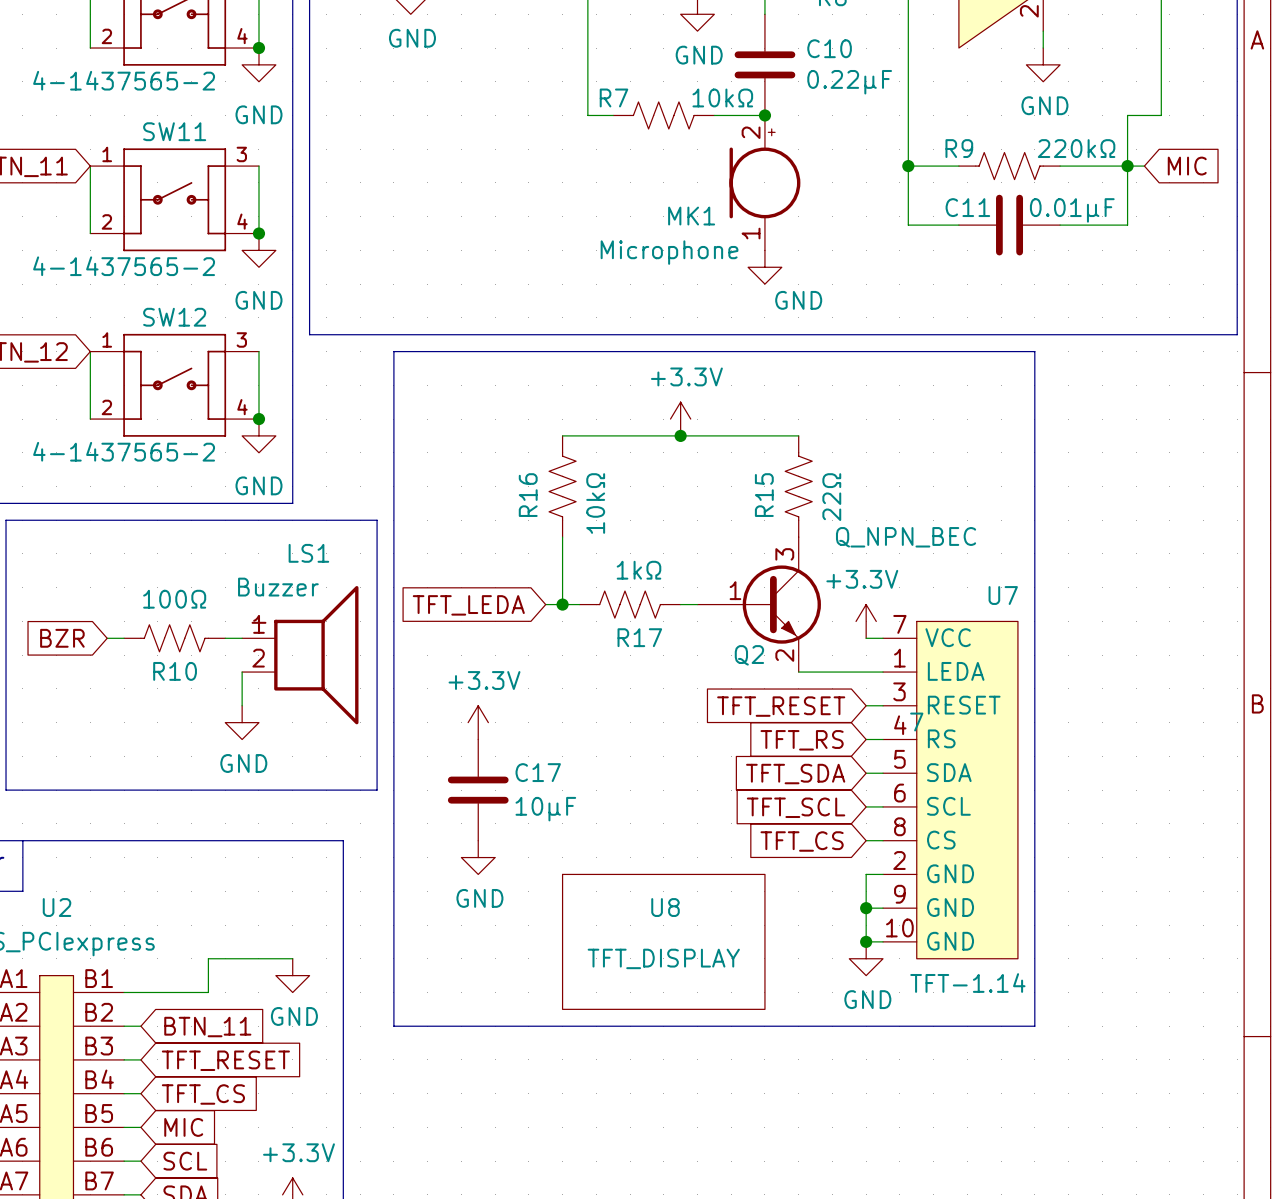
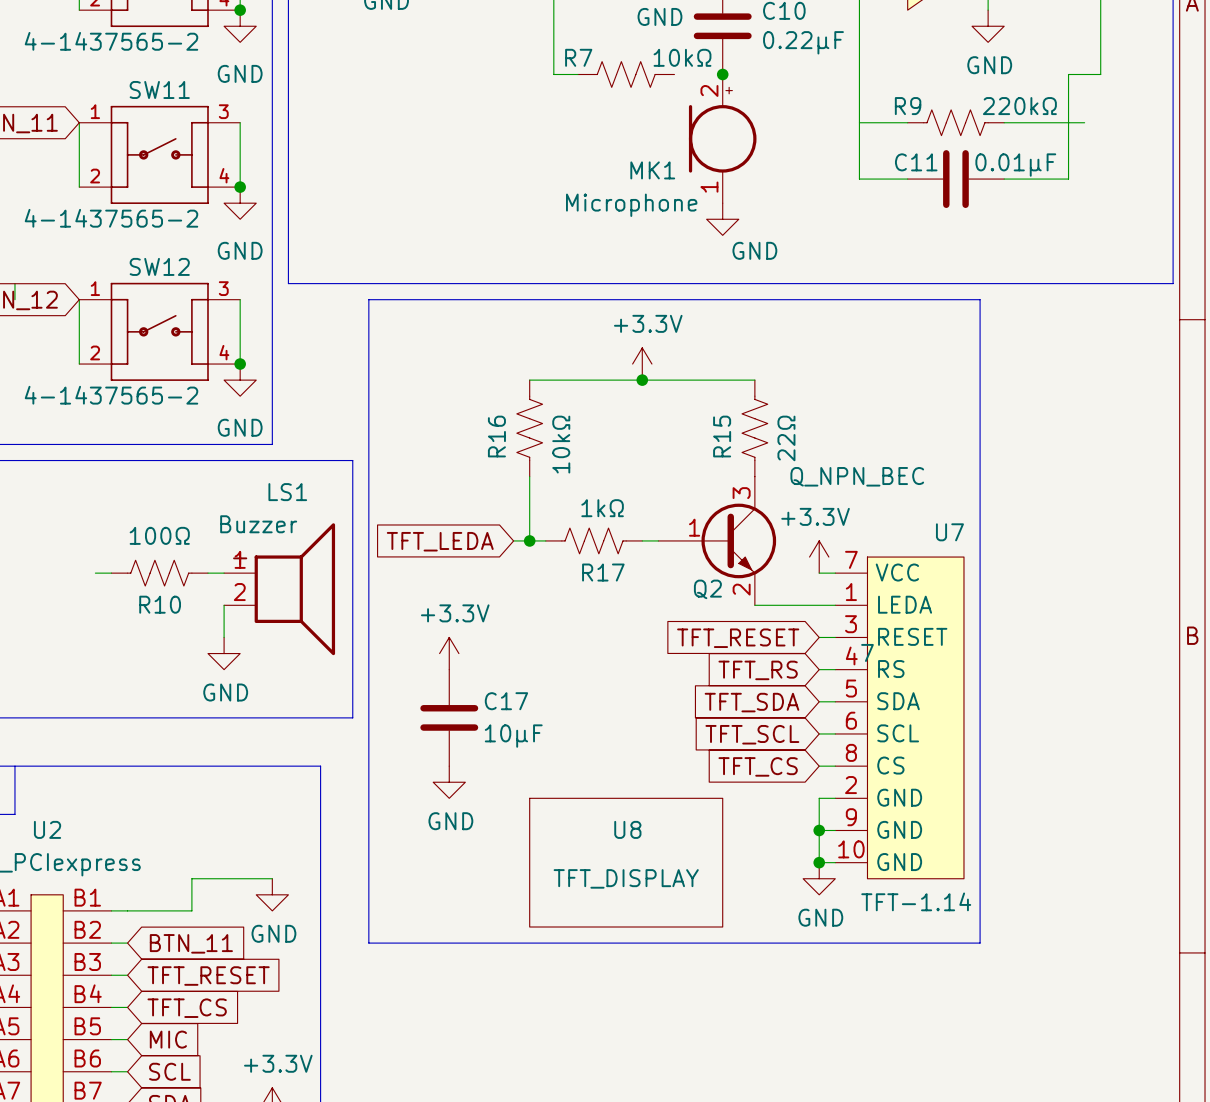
wire: (714, 115) (764, 115) -> none
junction: (908, 166) -> none
junction: (1127, 166) -> none
global label: MIC (1187, 166) -> none
wire: none -> (14, 283) (14, 299)
global label: BZR (62, 638) -> none

